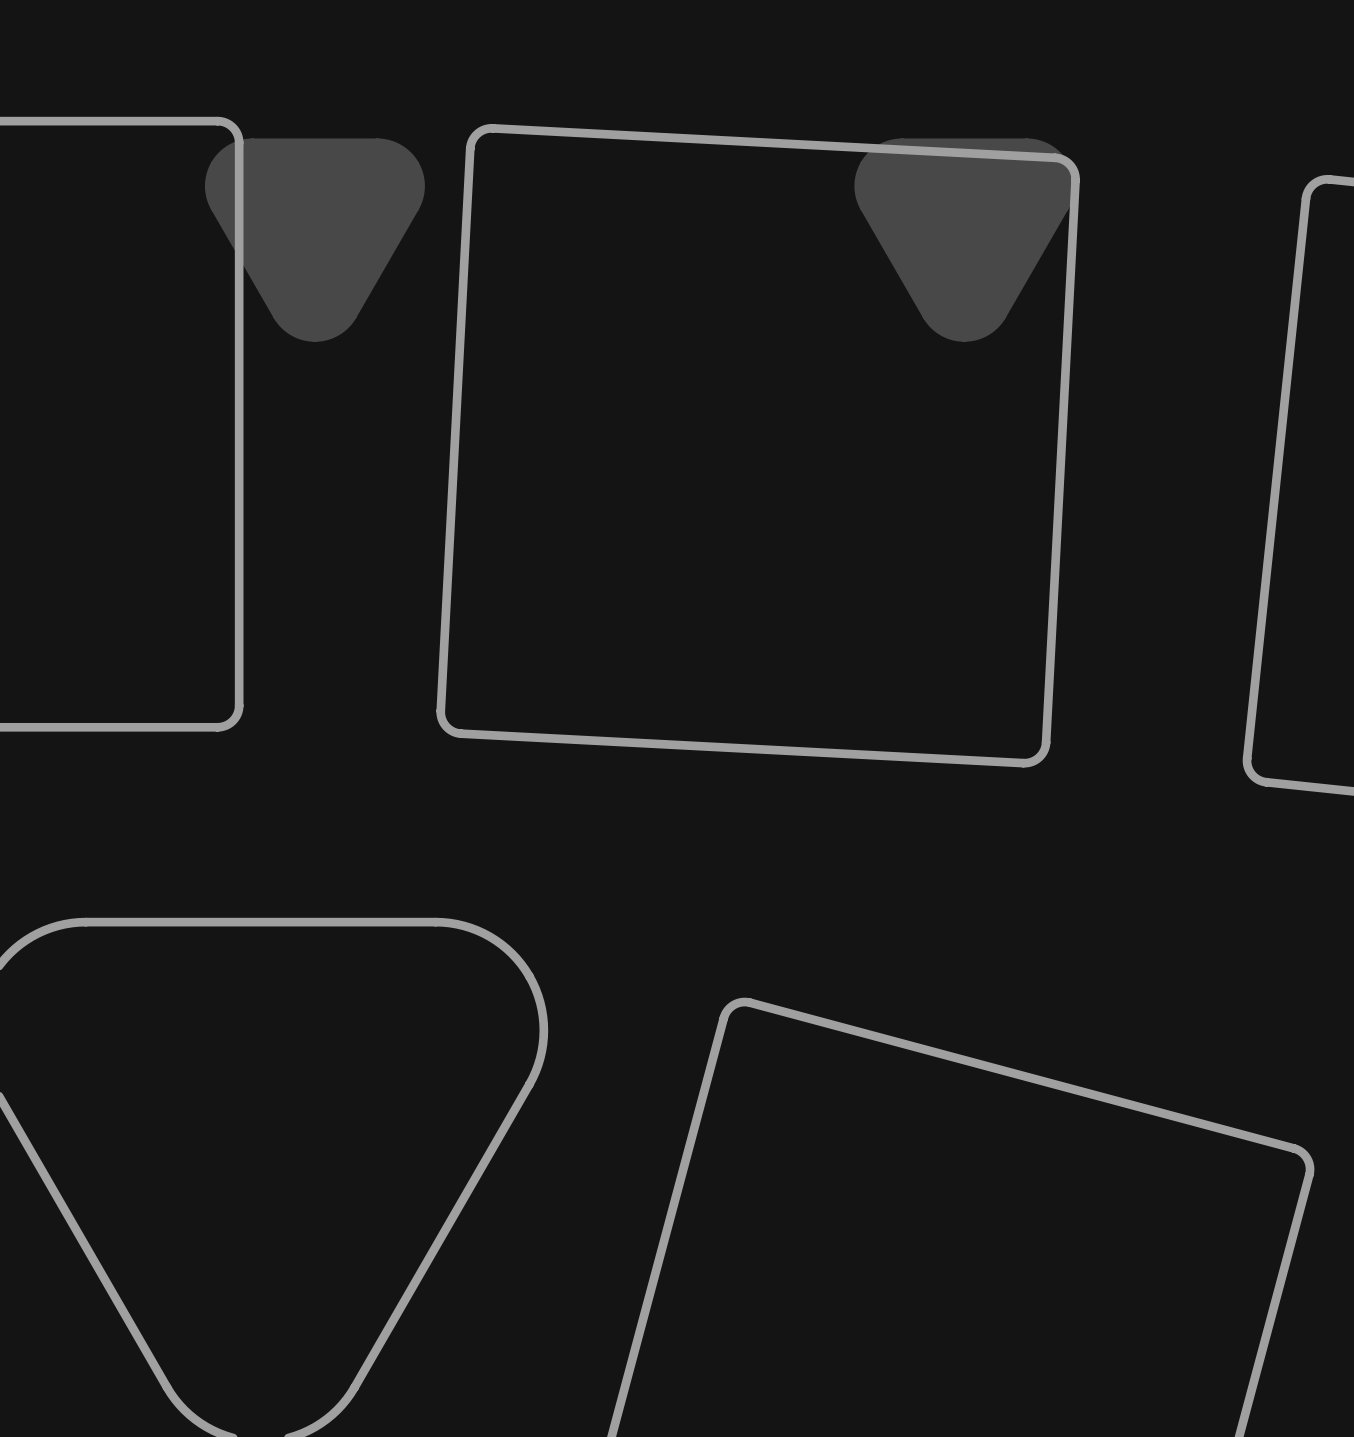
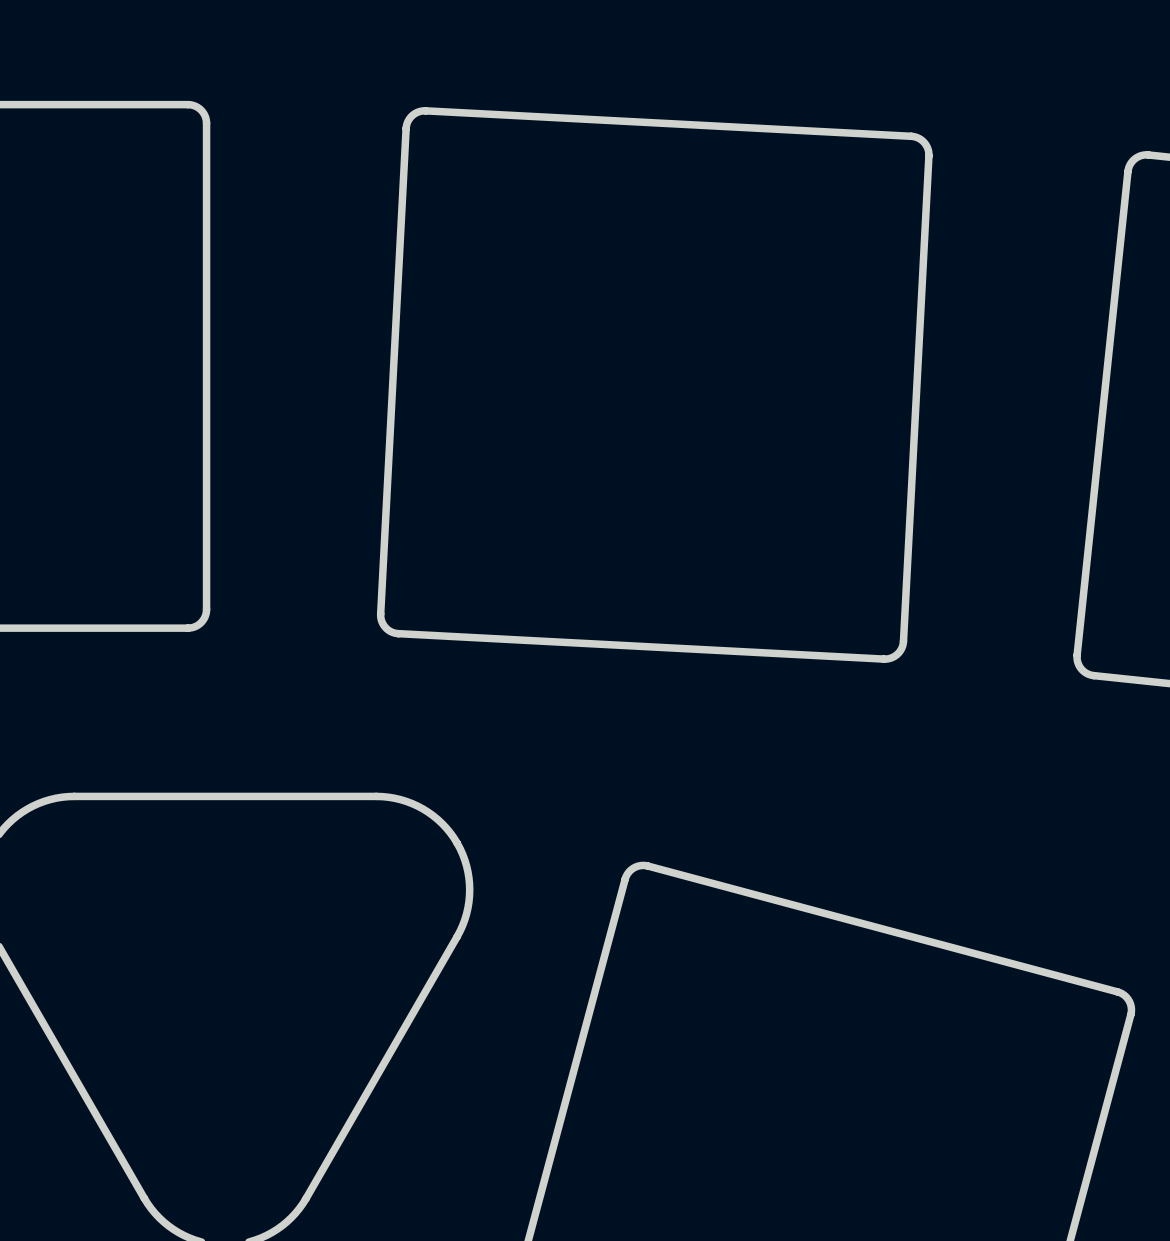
drawing: [209, 142, 421, 338] -> none
track: (377, 142) (246, 143) (226, 151) (212, 169) (209, 188) (213, 205) (278, 318) (286, 326) (298, 334) (312, 337) (323, 336) (336, 331) (347, 322) (417, 202) (420, 180) (413, 161) (396, 147) (377, 142) -> none
drawing: [858, 142, 1070, 338] -> none
track: (1026, 142) (896, 143) (875, 151) (862, 169) (858, 188) (863, 205) (928, 318) (935, 326) (947, 334) (961, 337) (972, 336) (986, 331) (996, 322) (1066, 202) (1069, 180) (1062, 161) (1045, 147) (1026, 142) -> none

